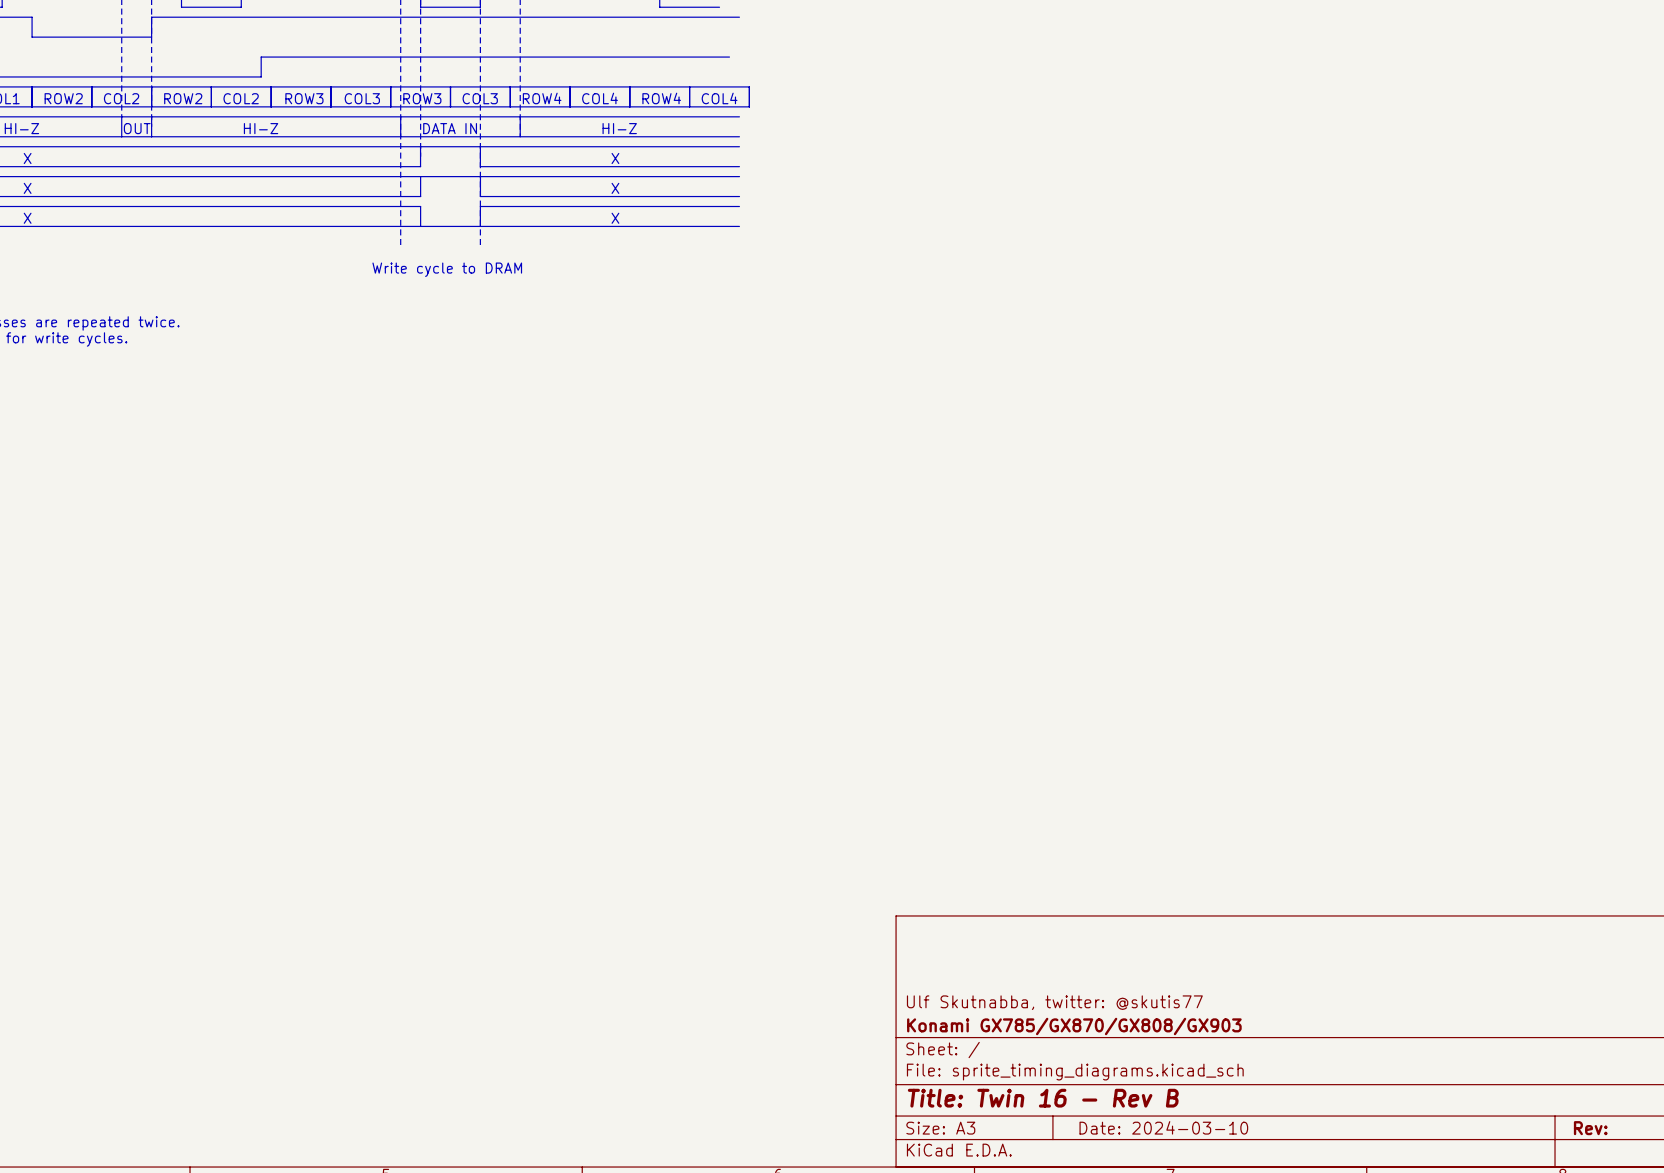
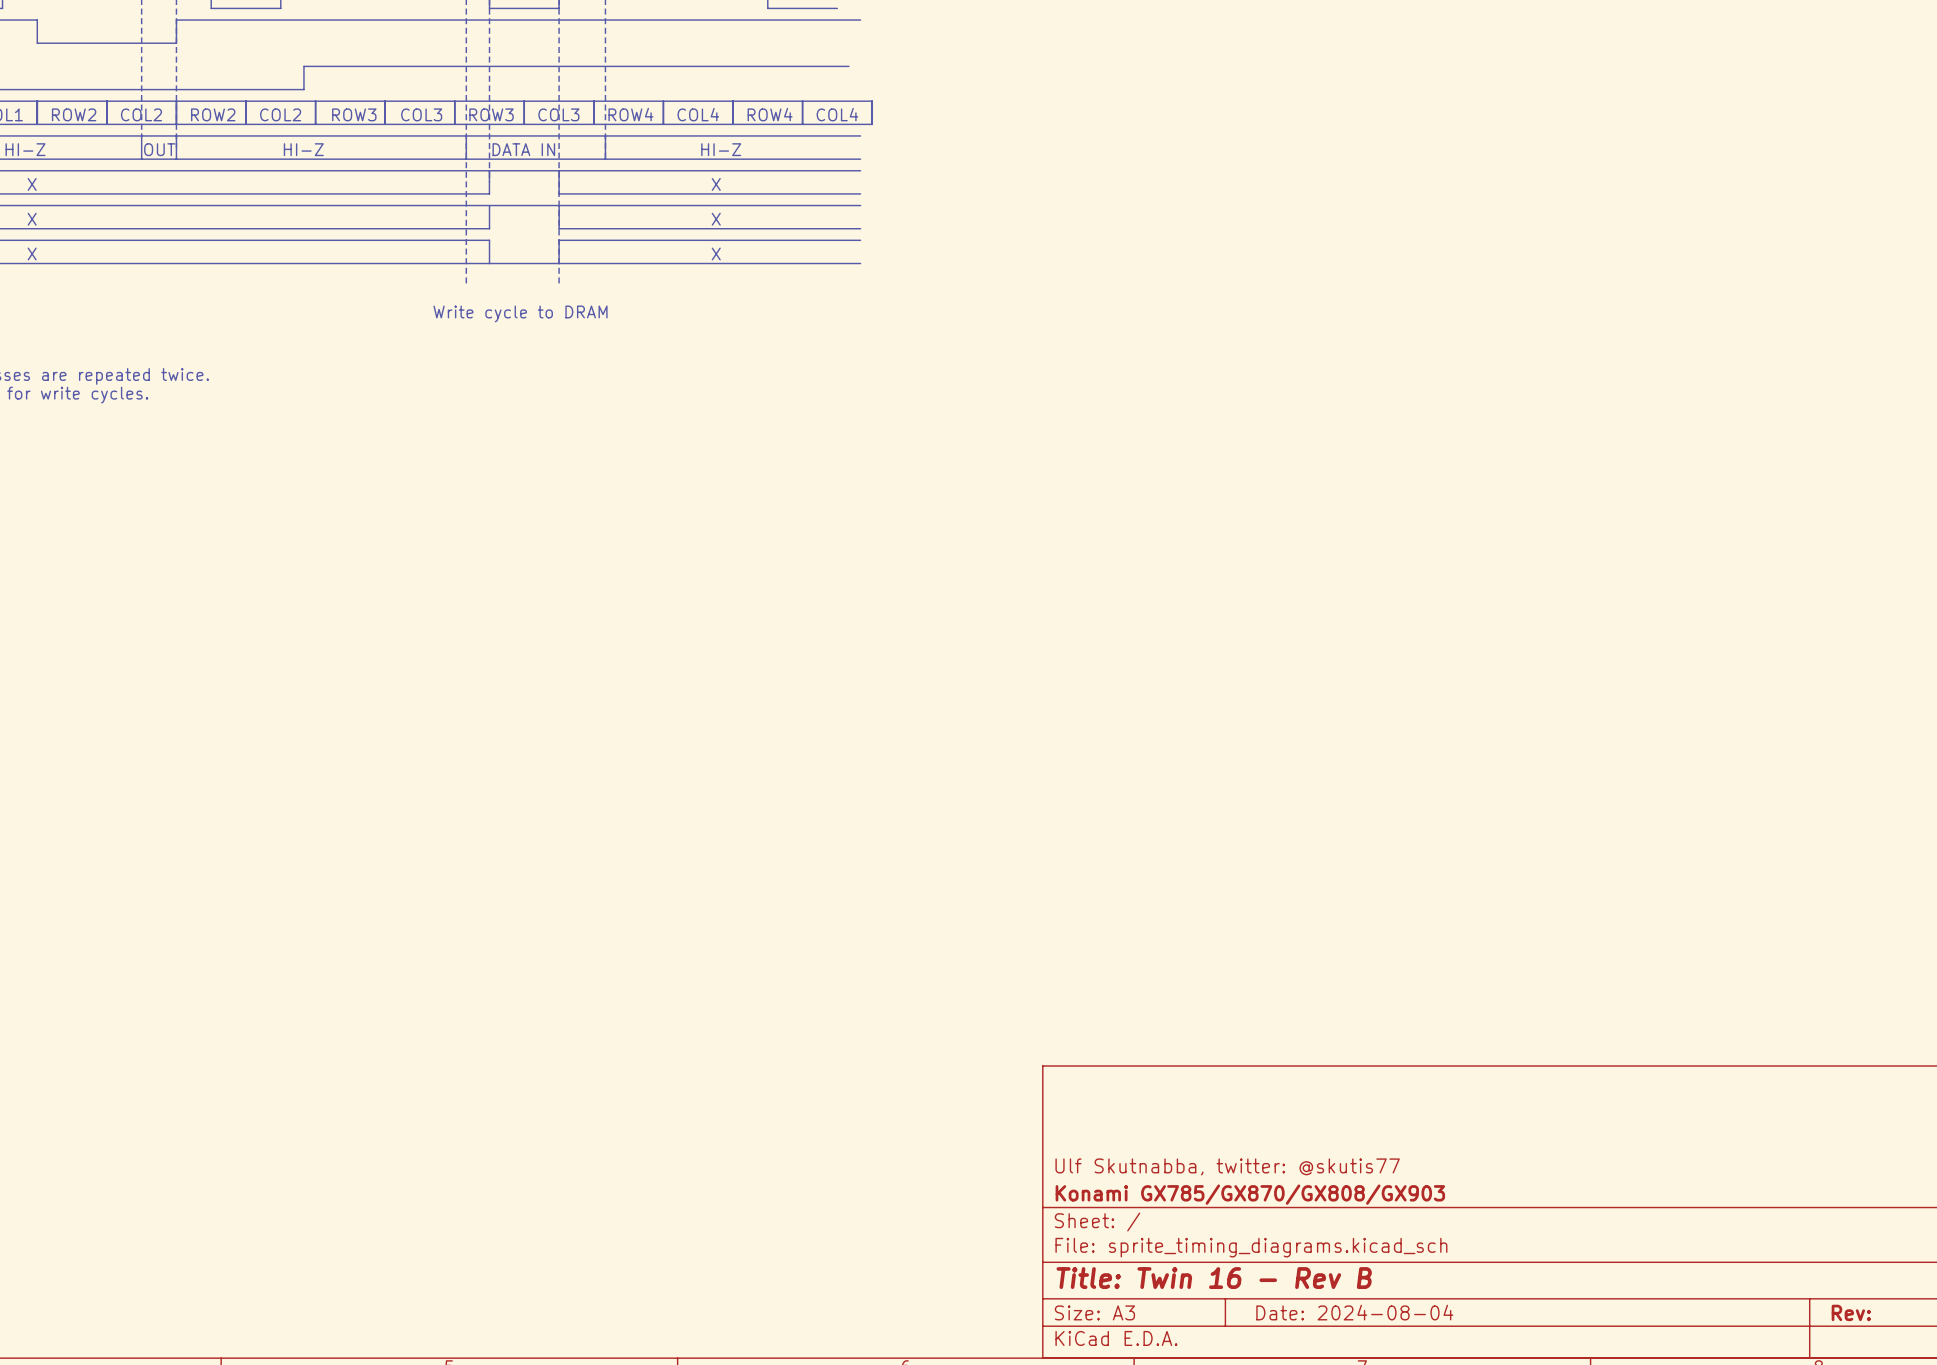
title block: Date: 2024-03-10 (1163, 1127) -> Date: 2024-08-04 (1354, 1312)

